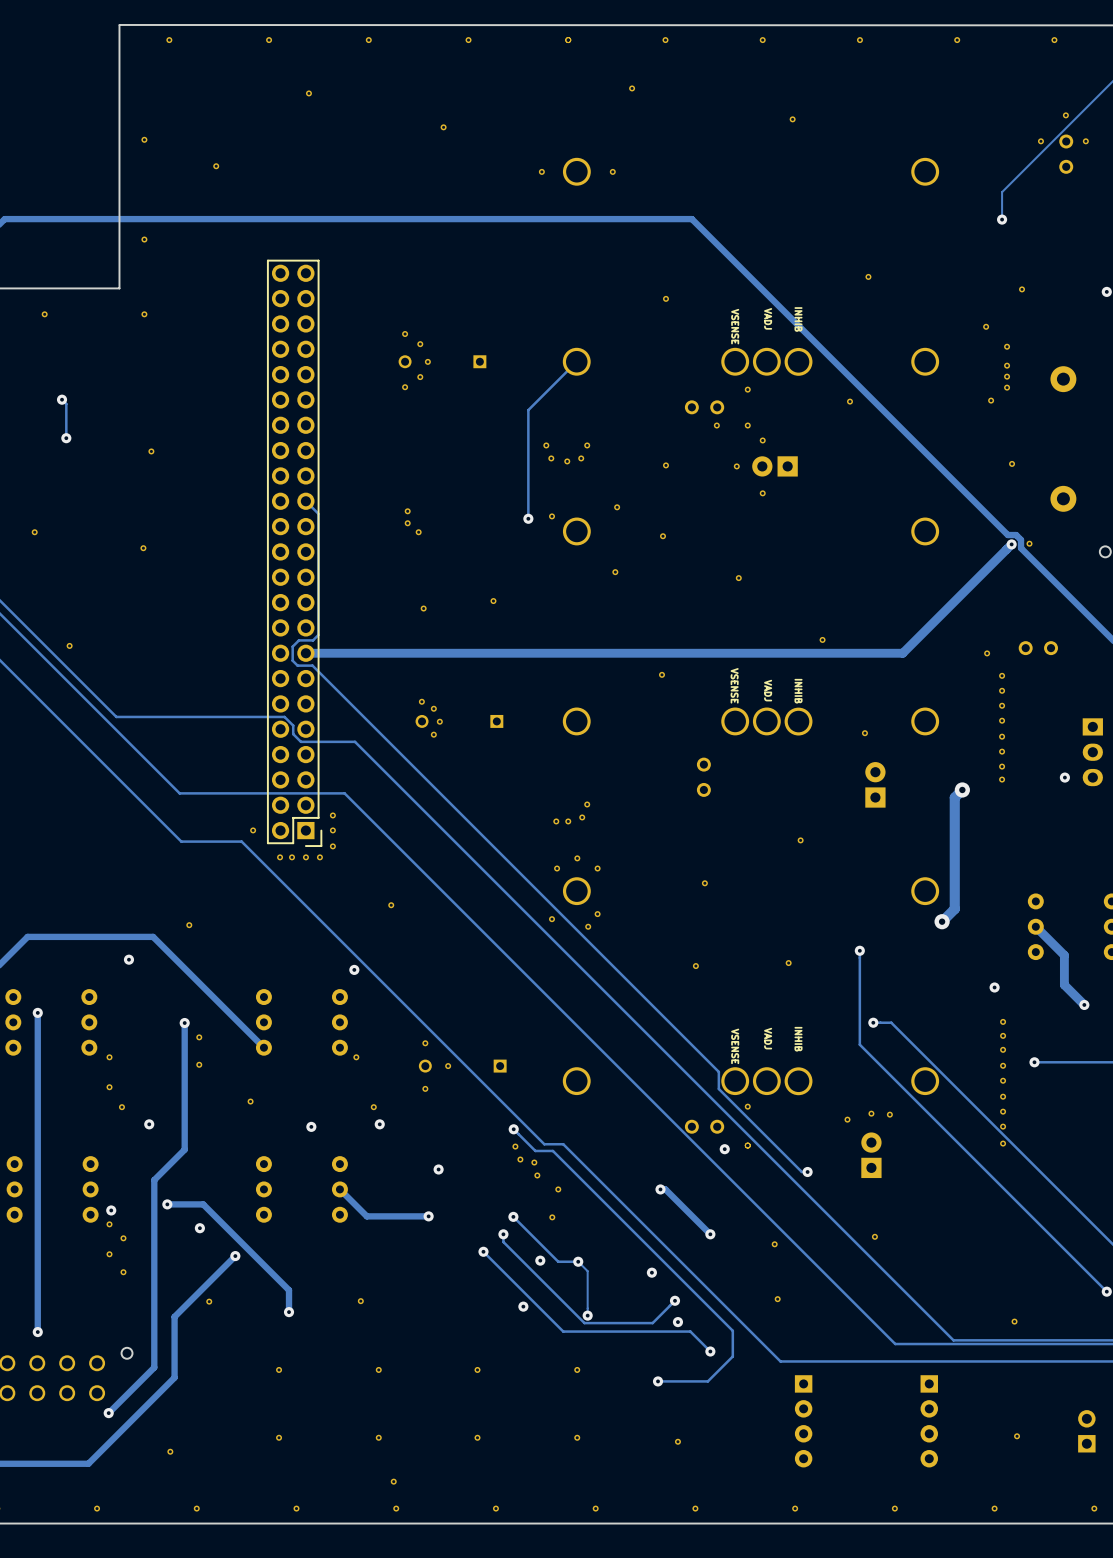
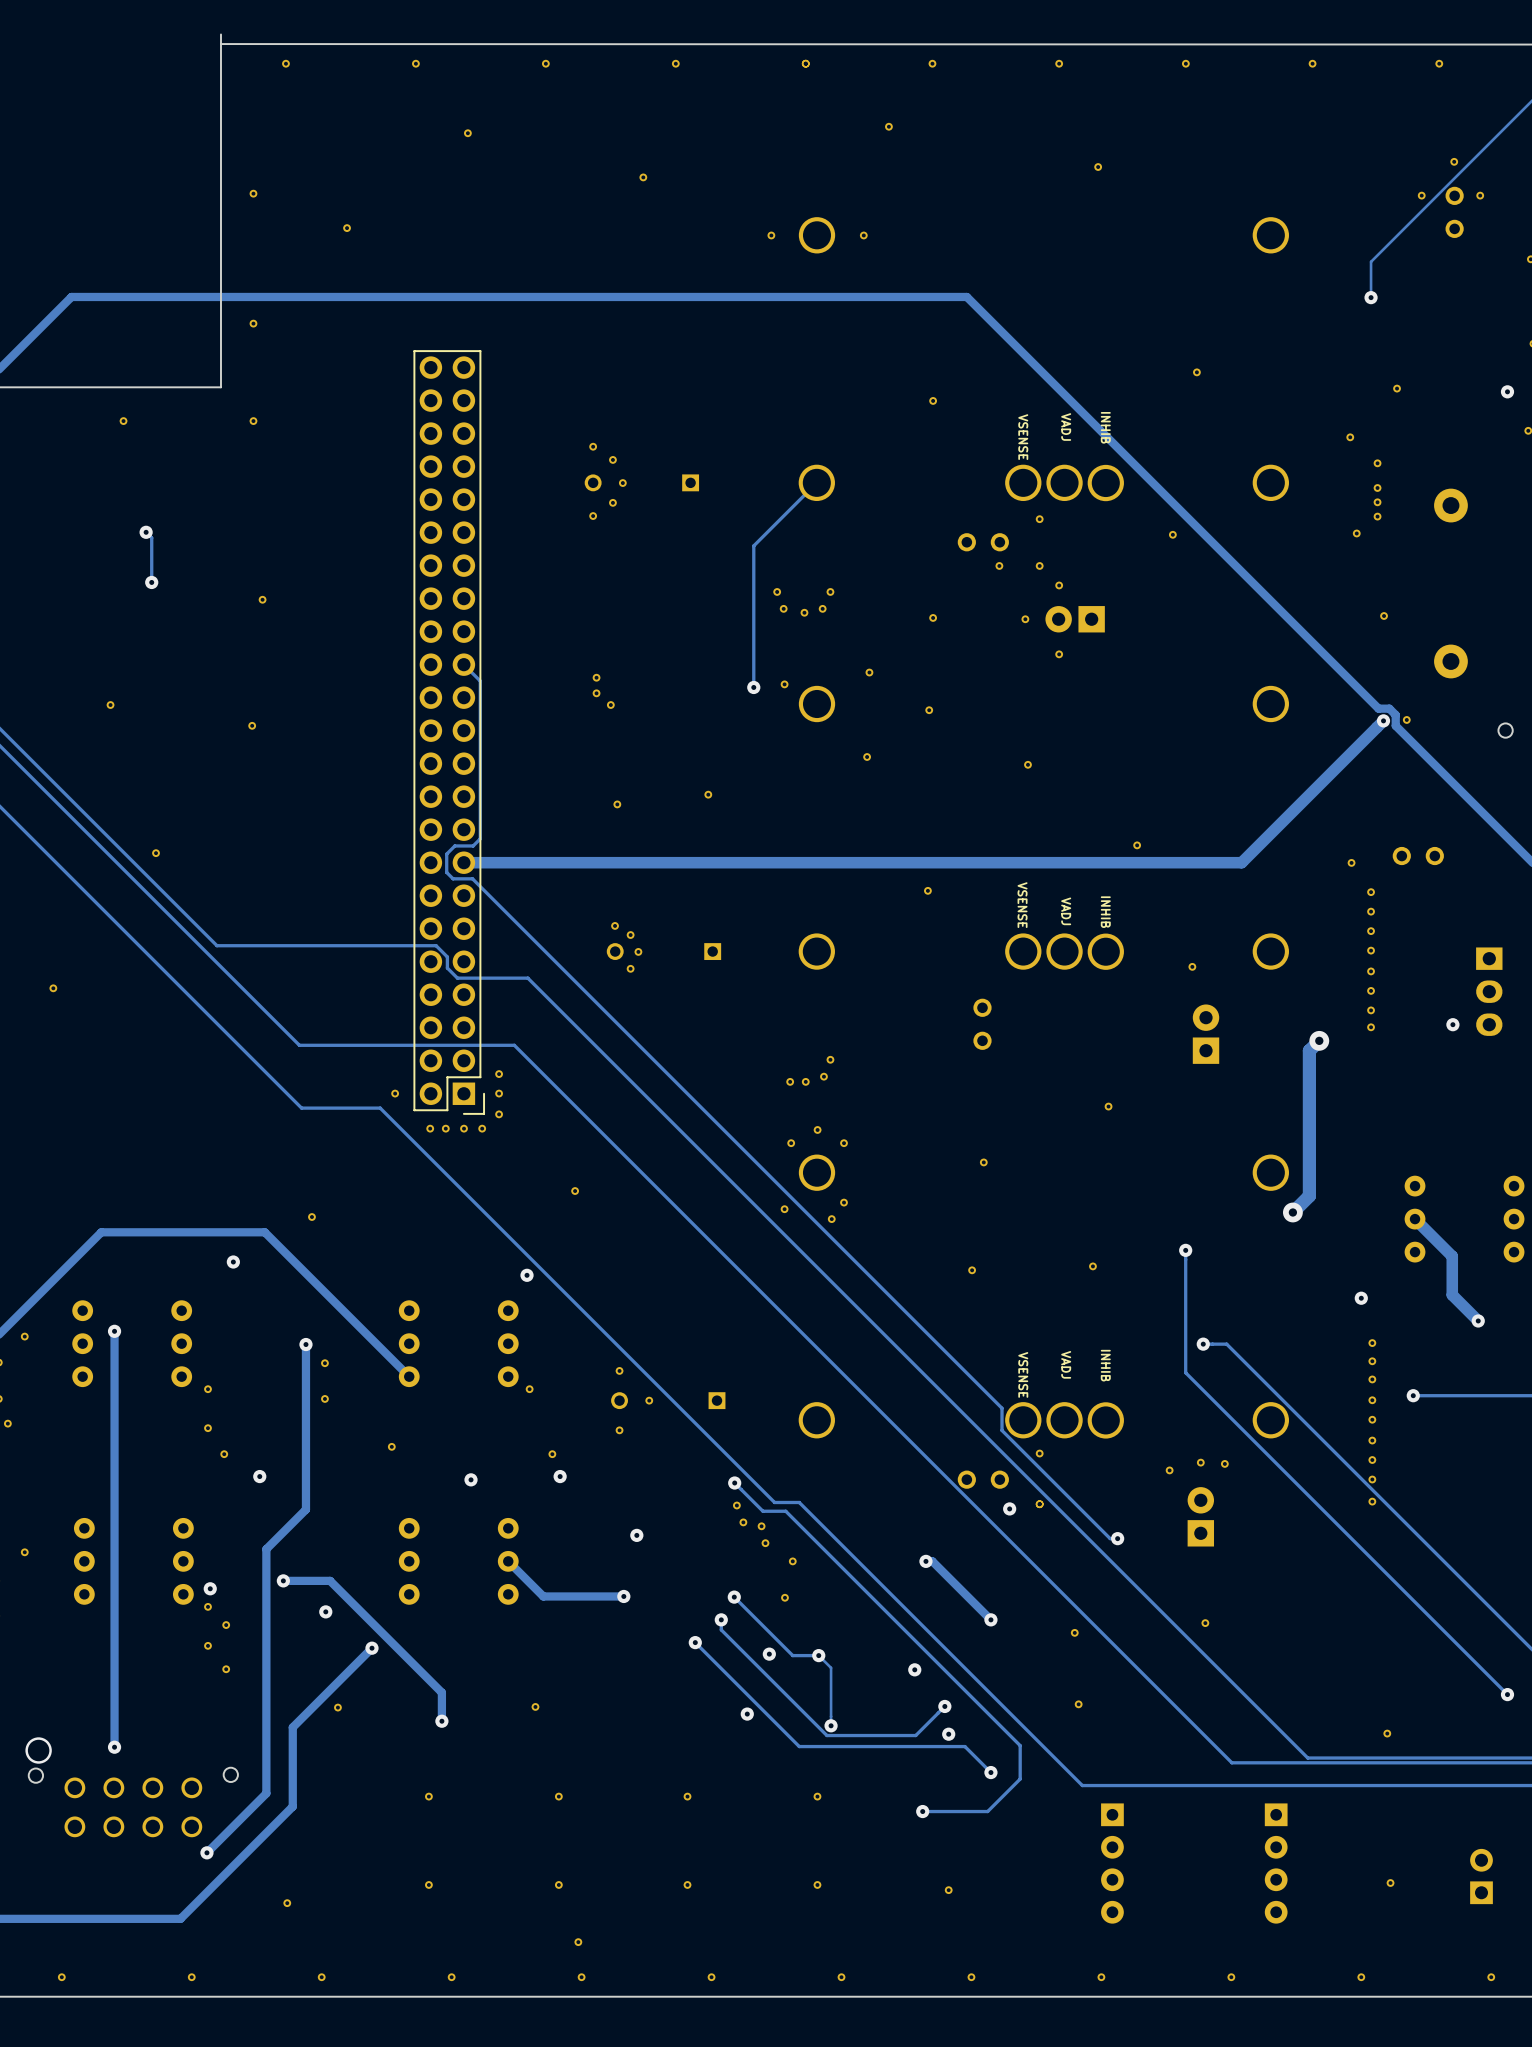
board edge: none -> (220, 34) (220, 44)

